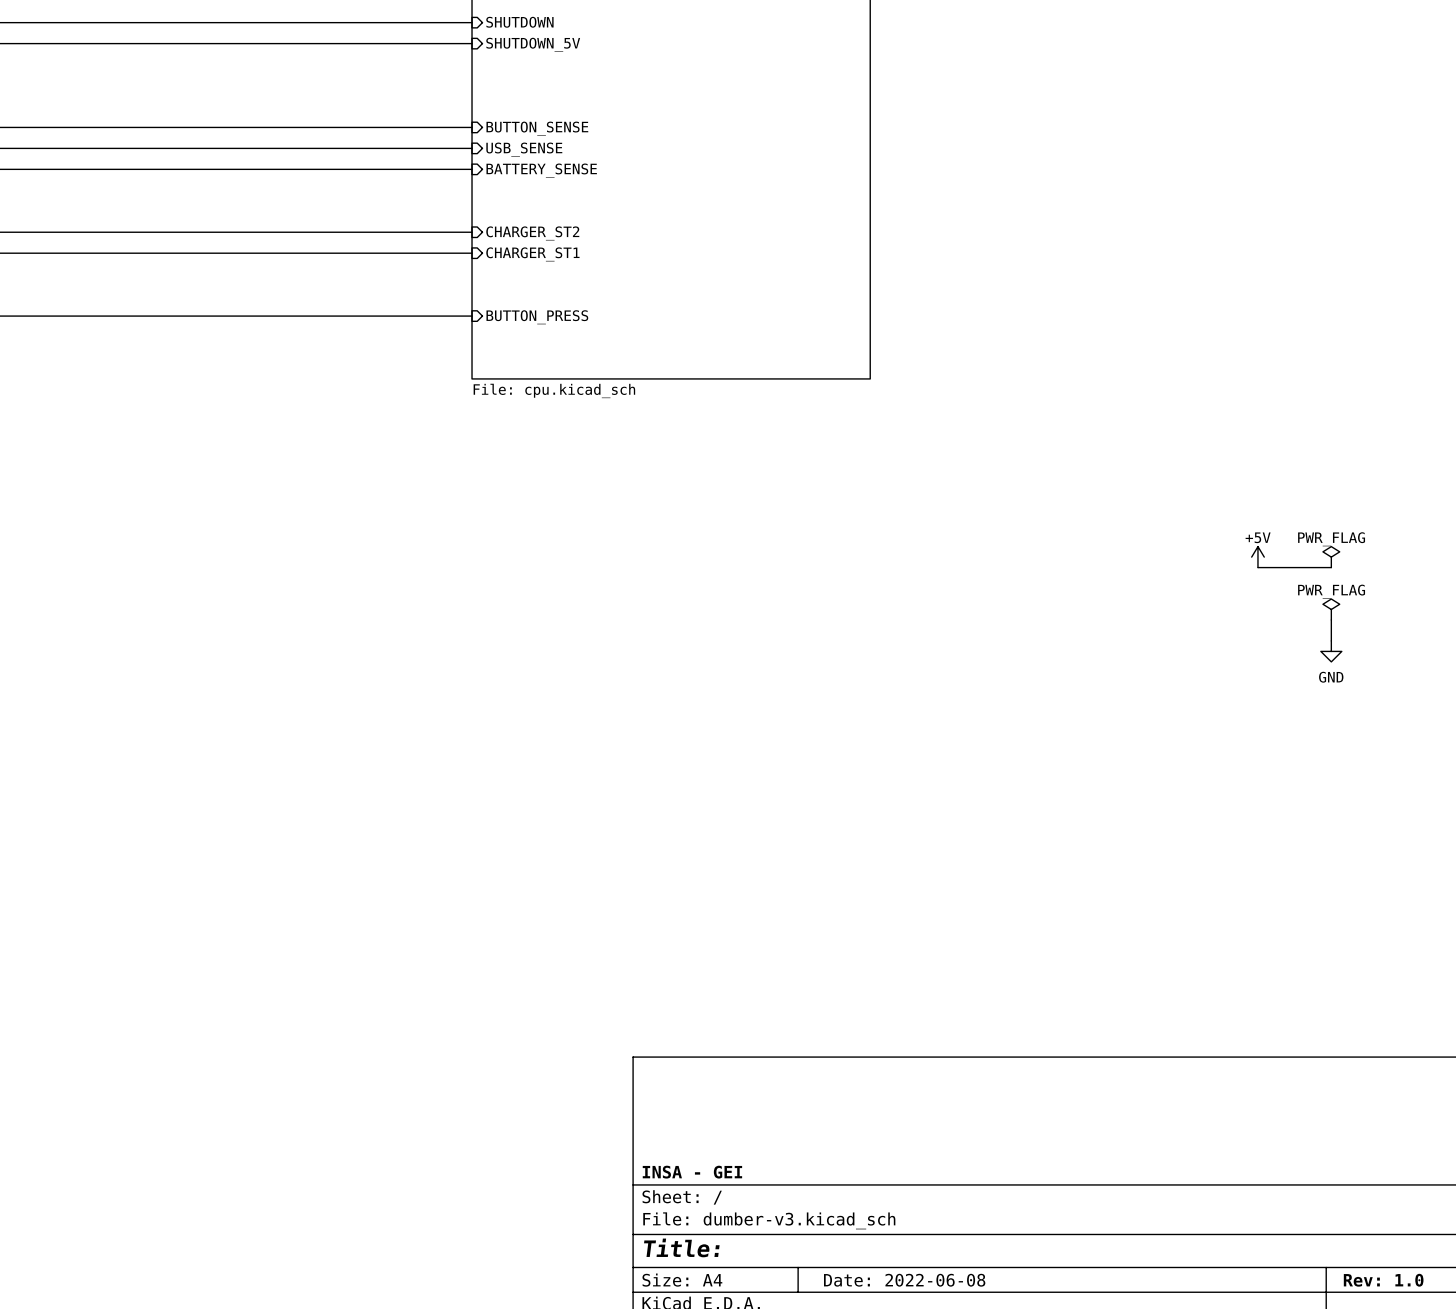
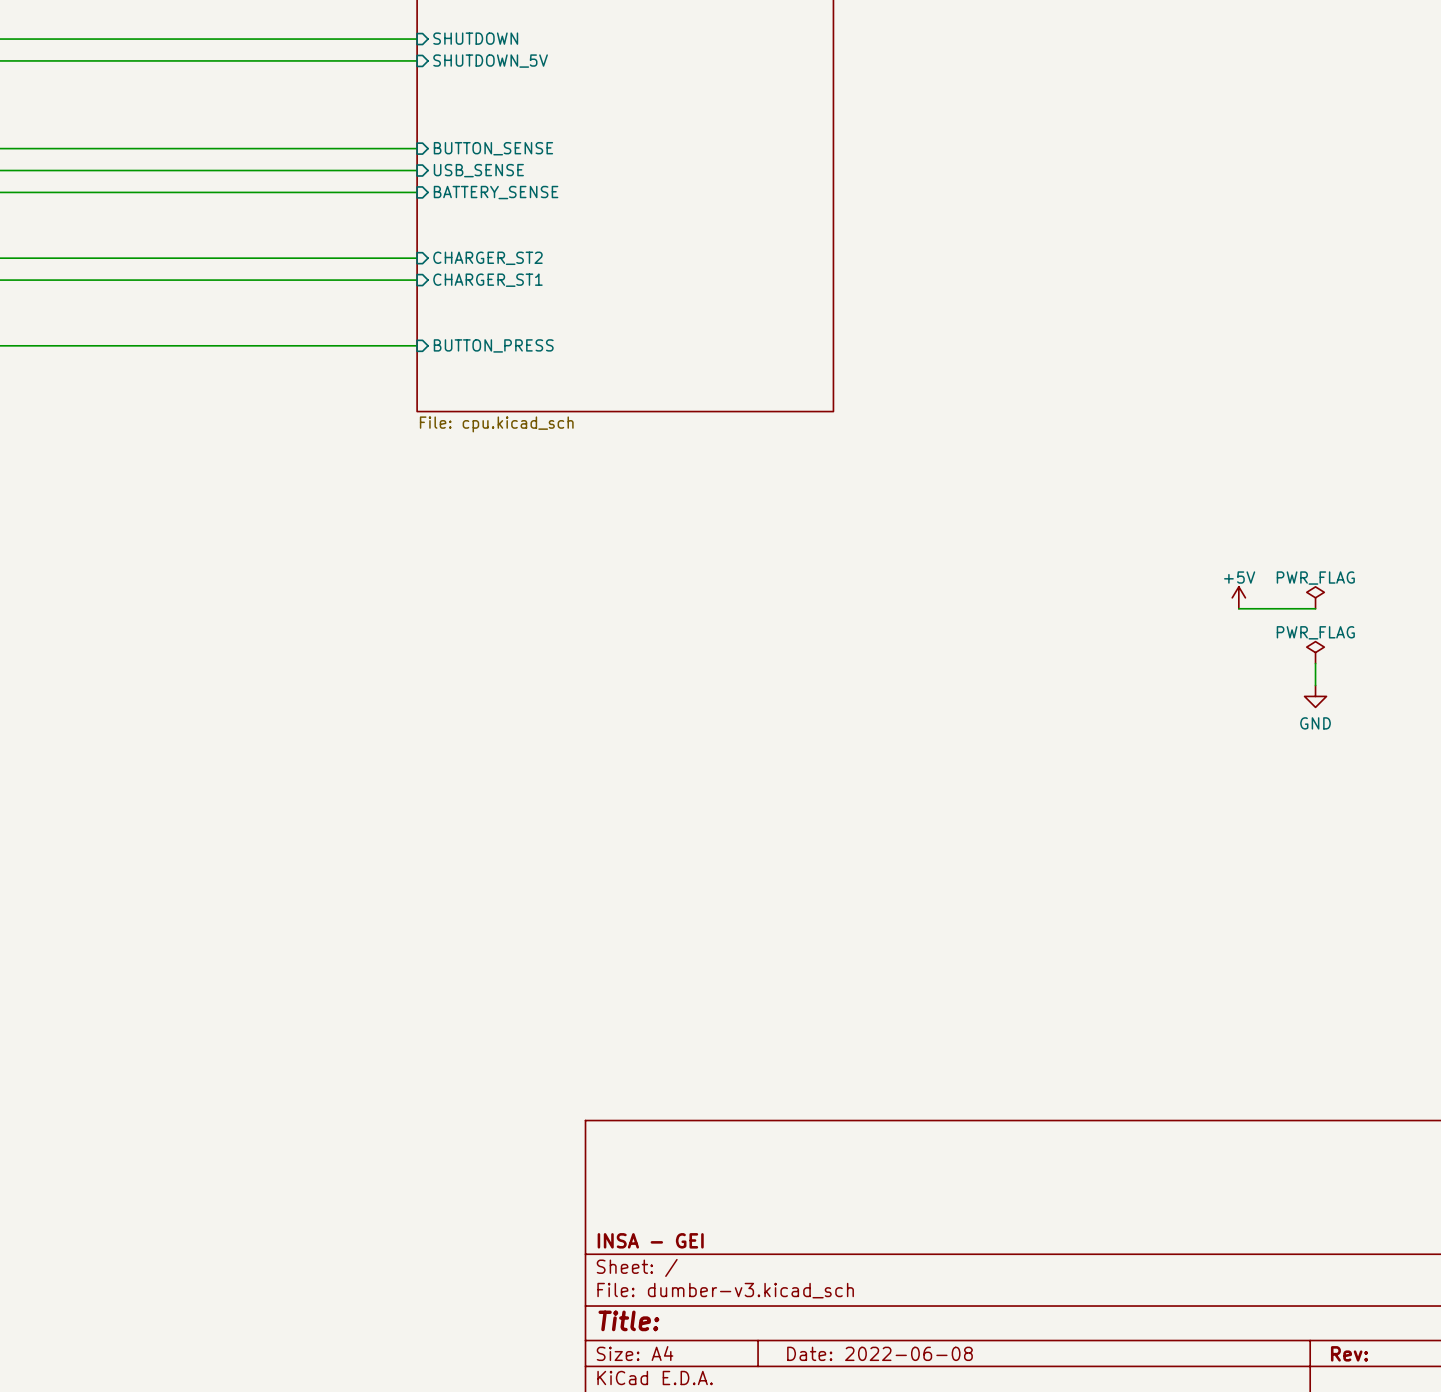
title block: Rev: 1.0 (1383, 1280) -> Rev: (1349, 1353)

